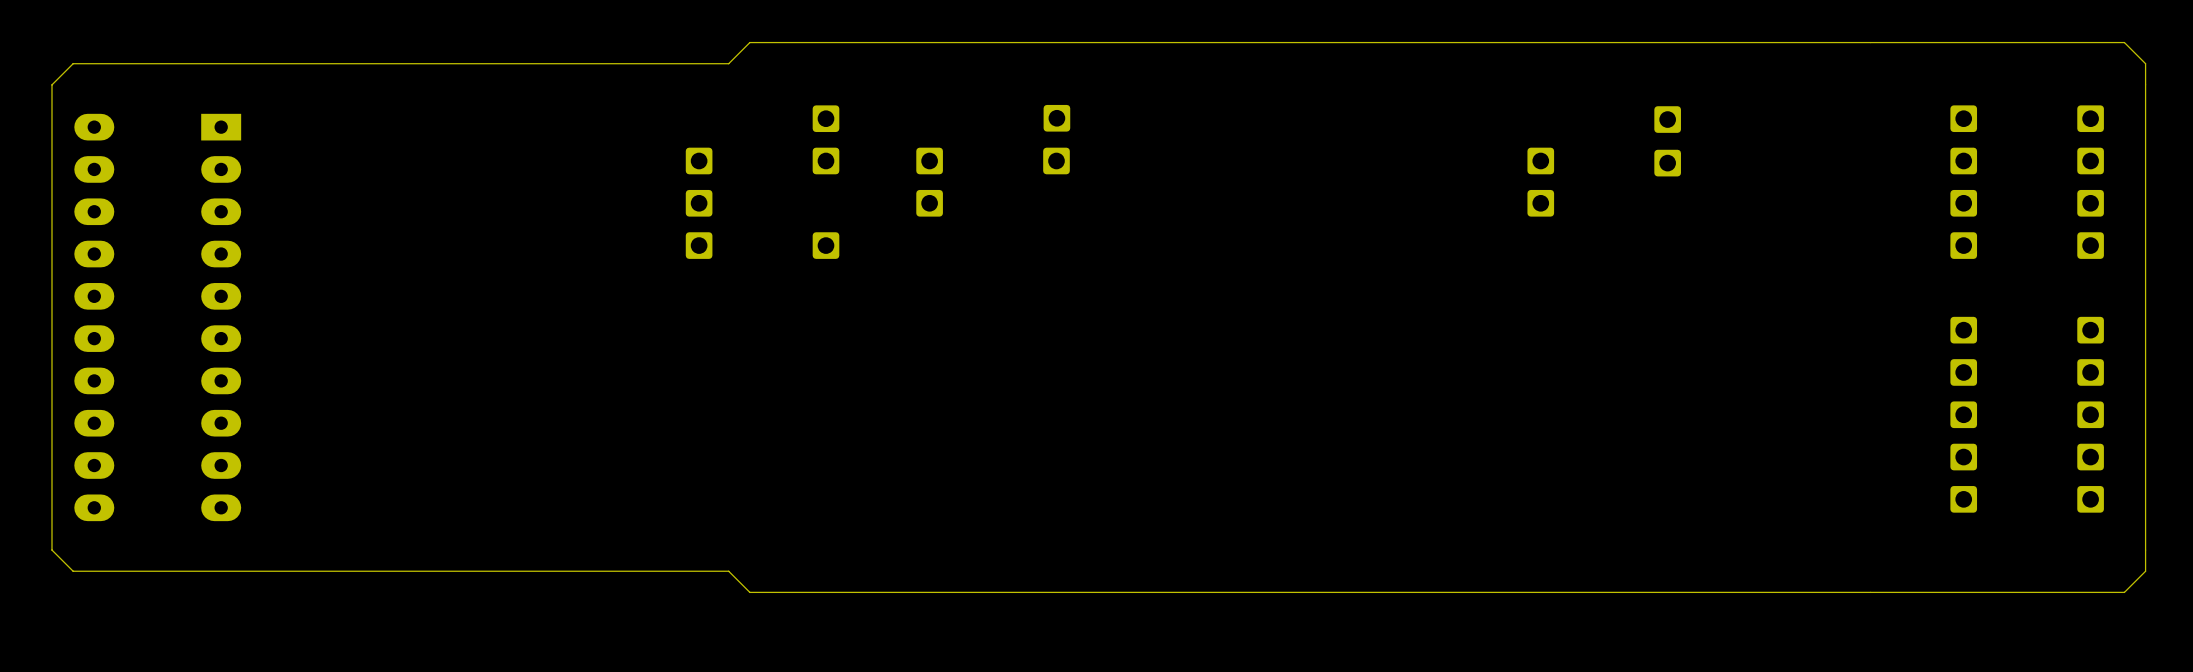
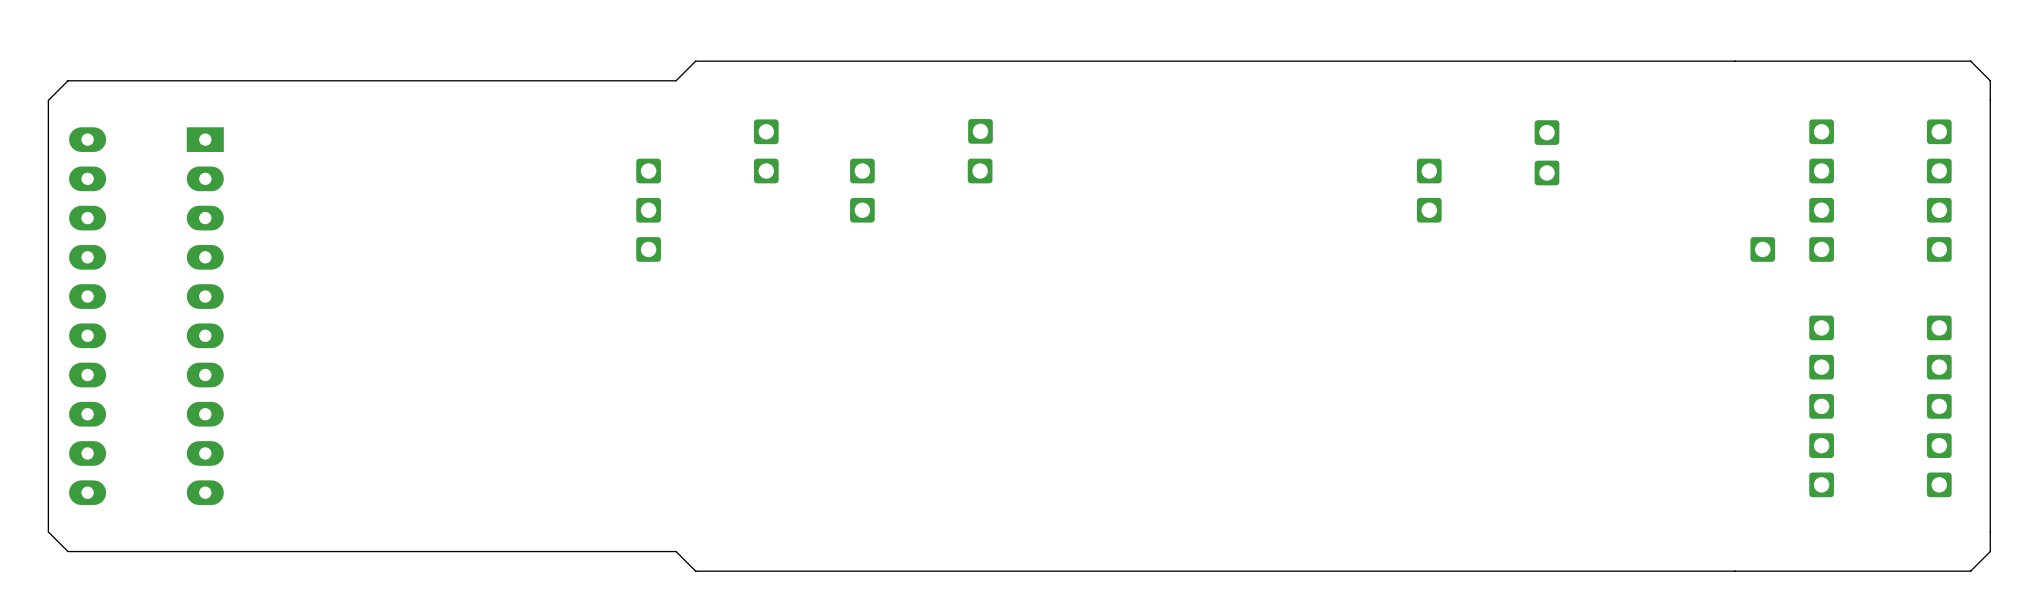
part: (825, 245) -> none
part: none -> (1762, 249)

